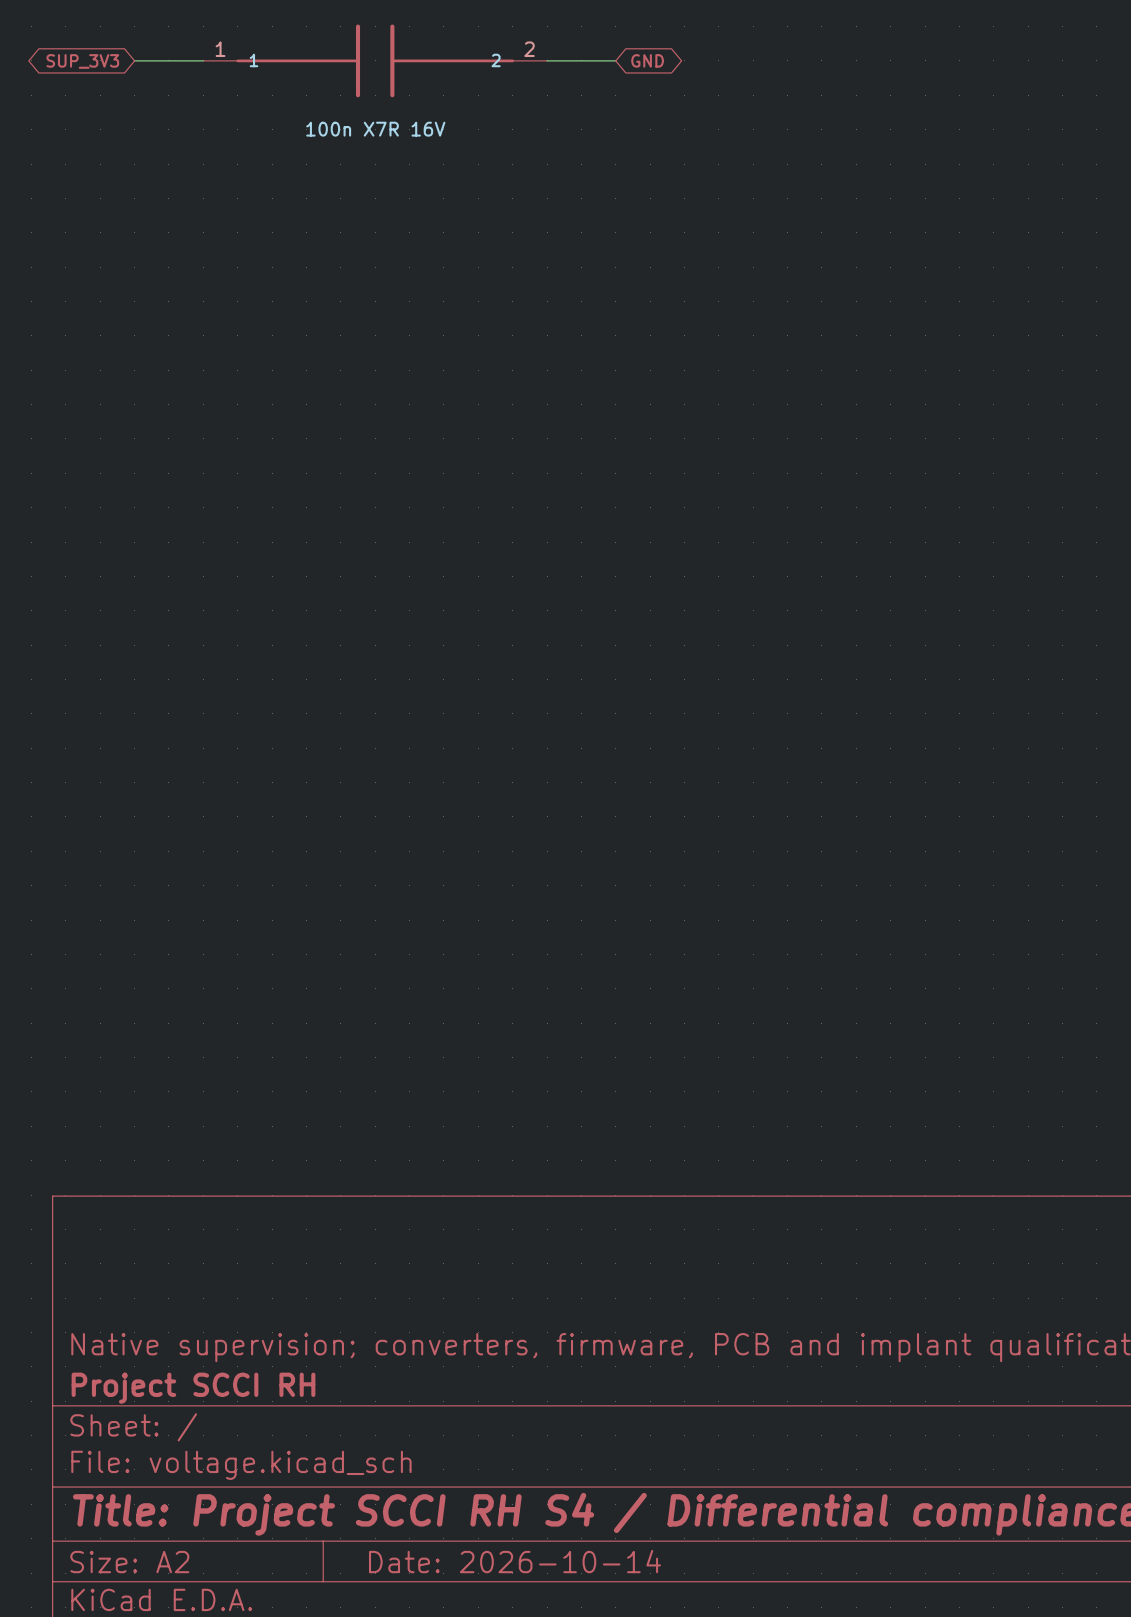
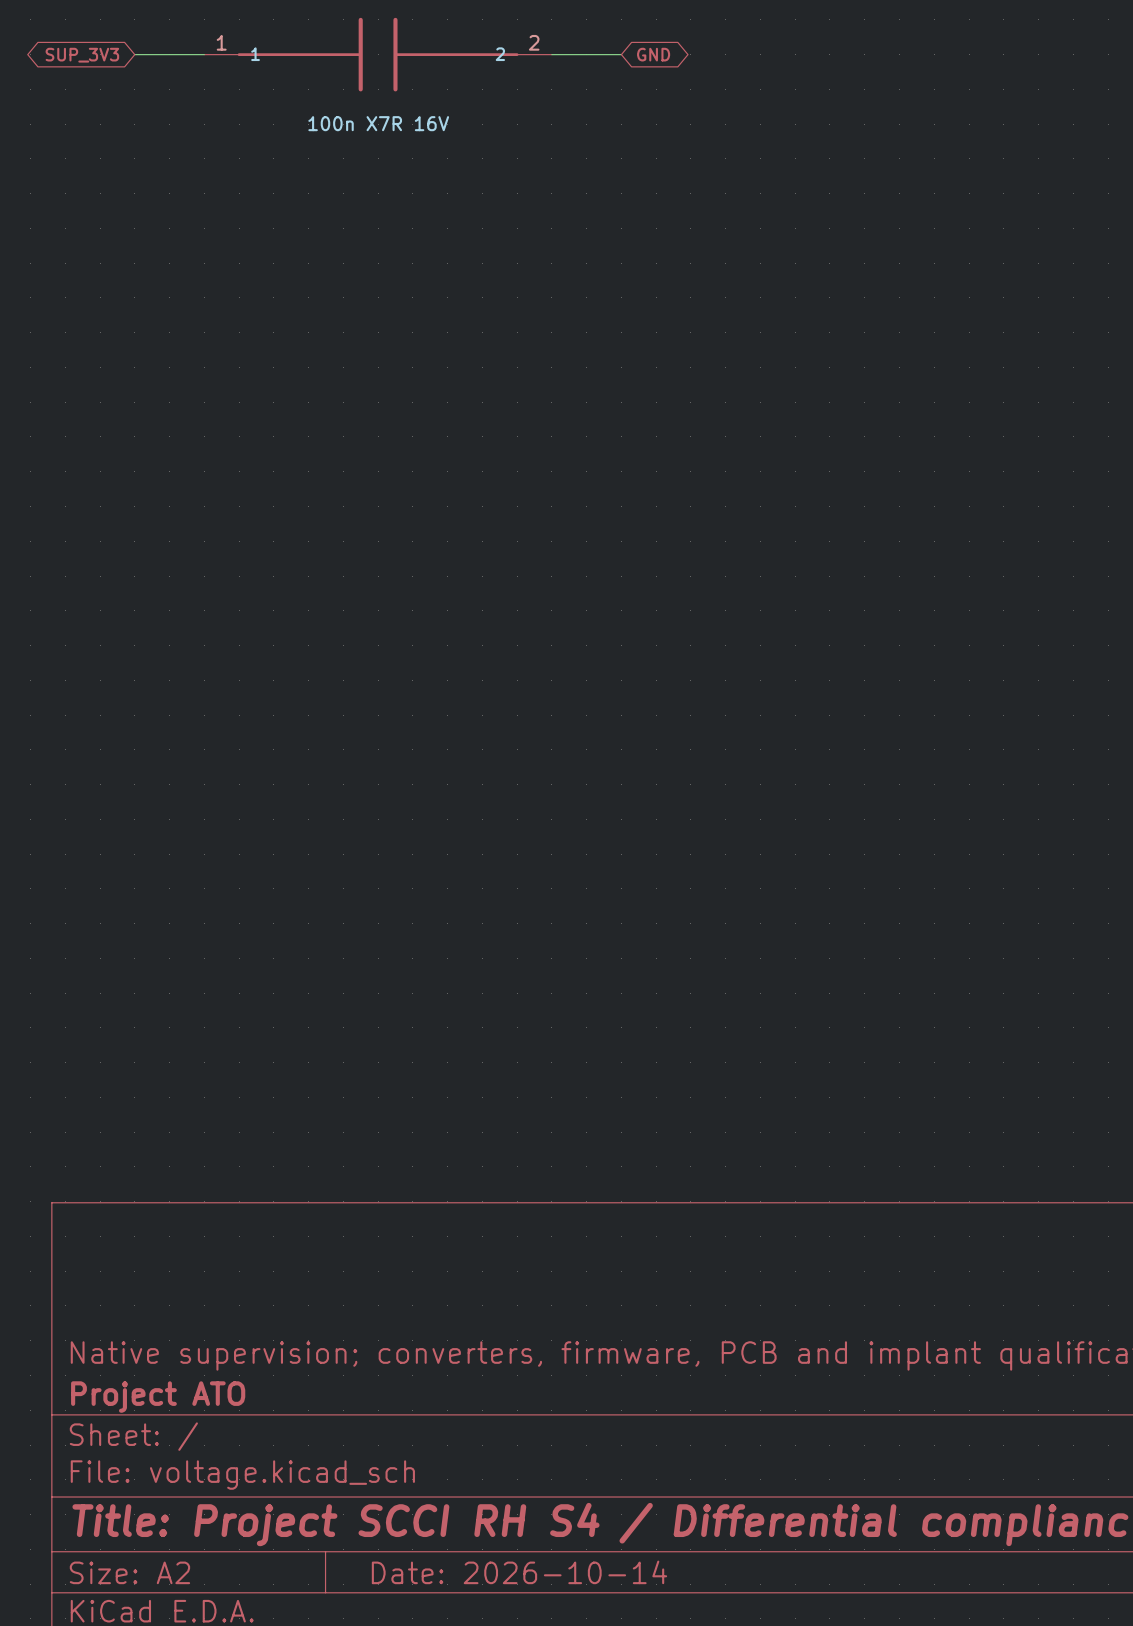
title block: Project SCCI RH (193, 1388) -> Project ATO (158, 1397)

